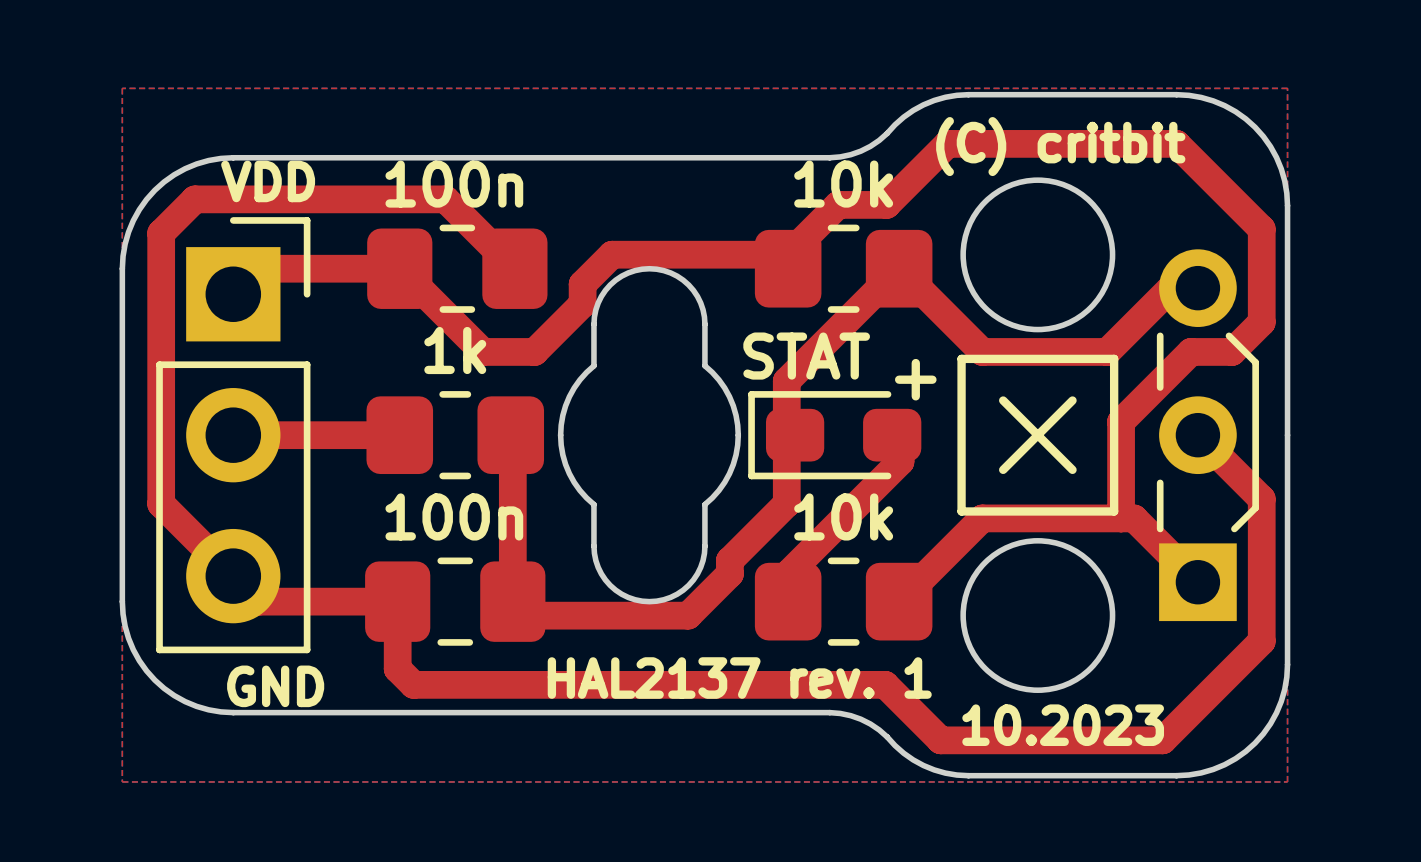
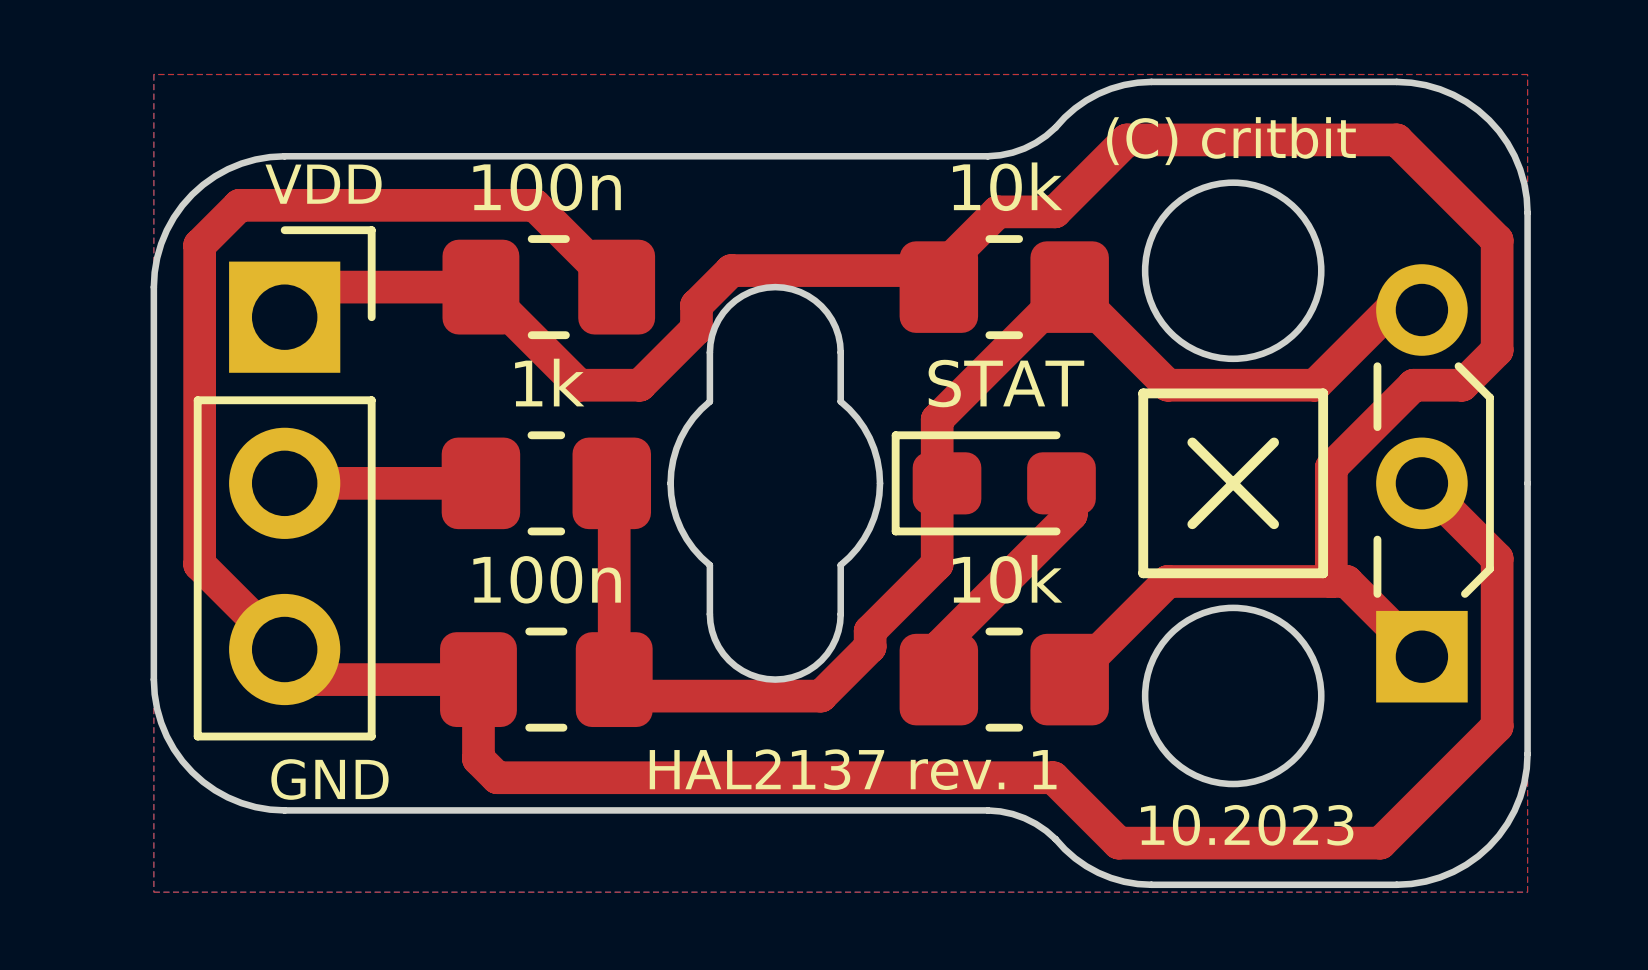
part value position: STAT (806, 356) -> STAT (1006, 383)
line: (915, 363) (915, 396) -> none
line: (899, 379) (932, 379) -> none

